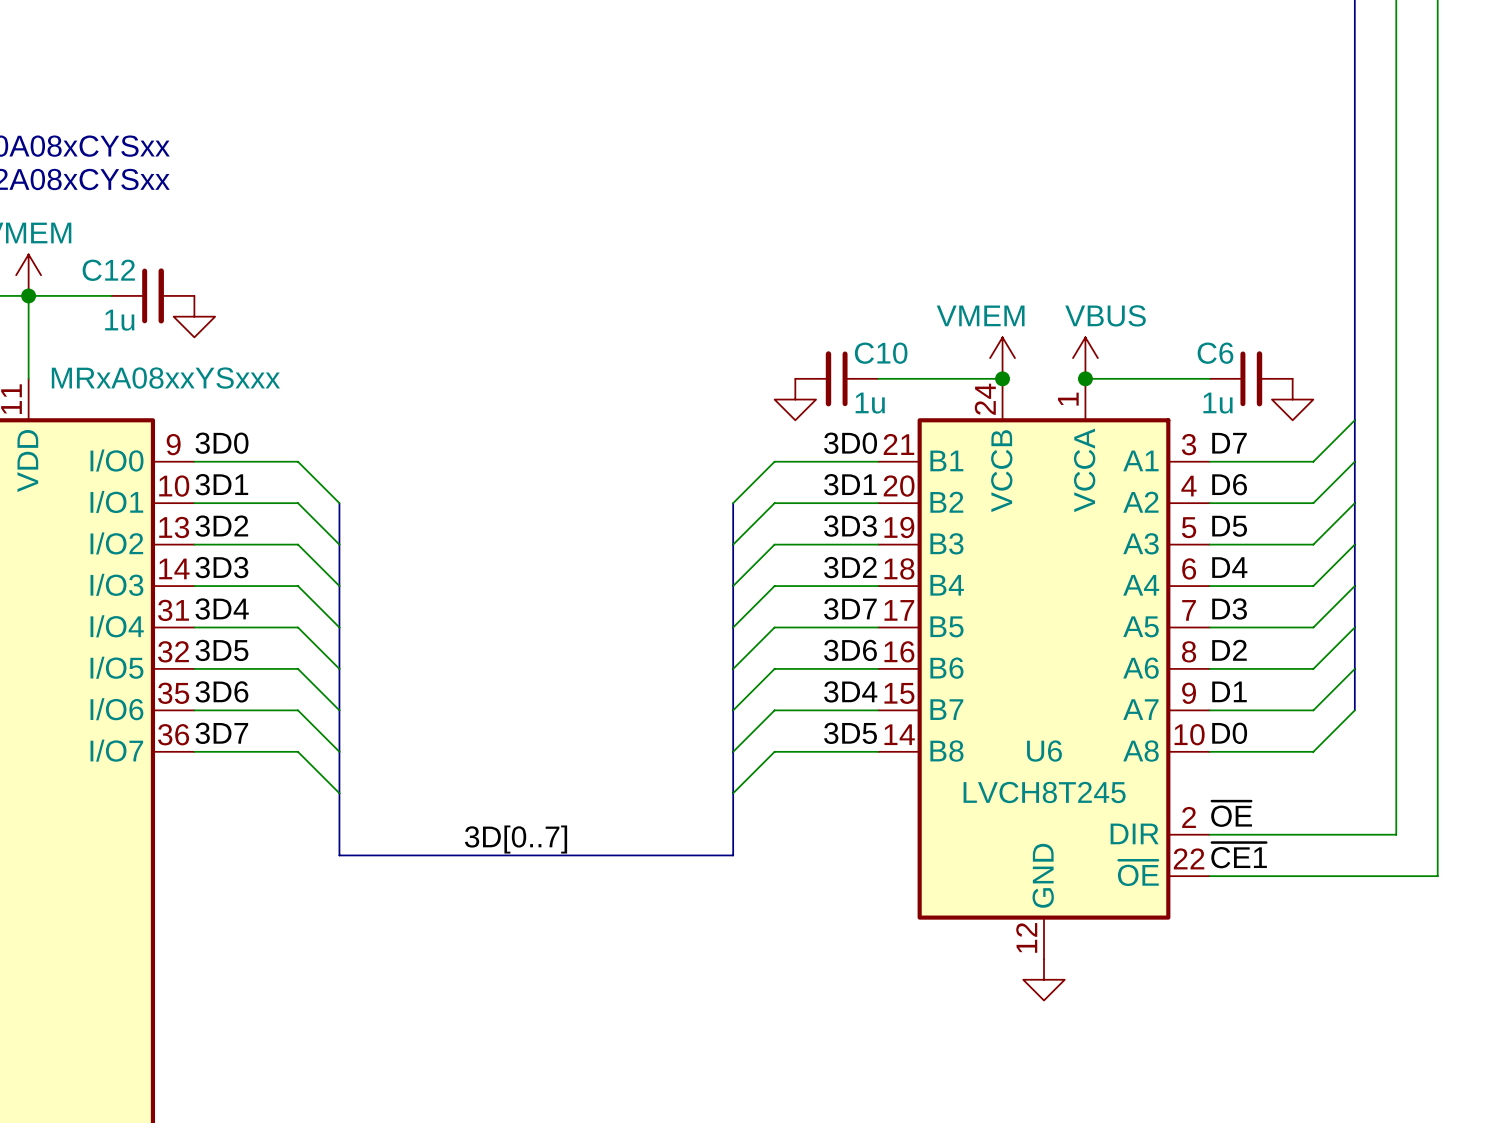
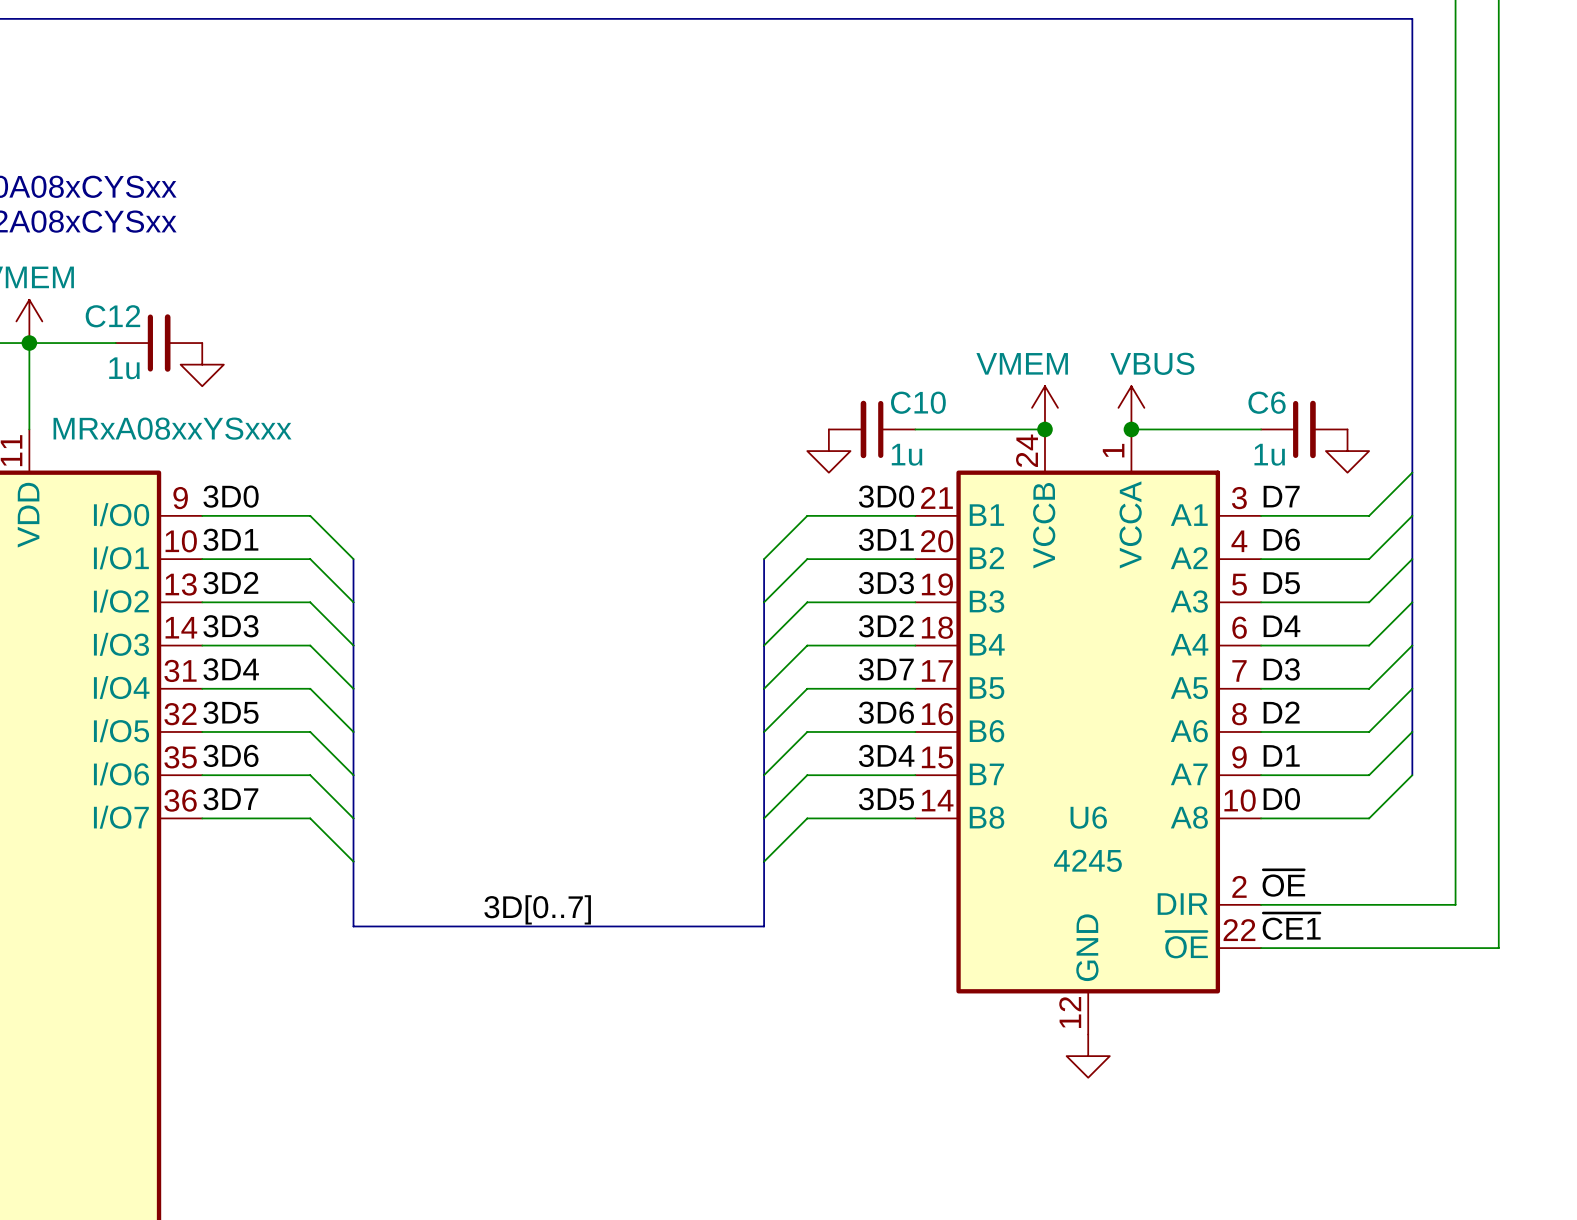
U6 value: LVCH8T245 (1044, 792) -> 4245 (1087, 860)

